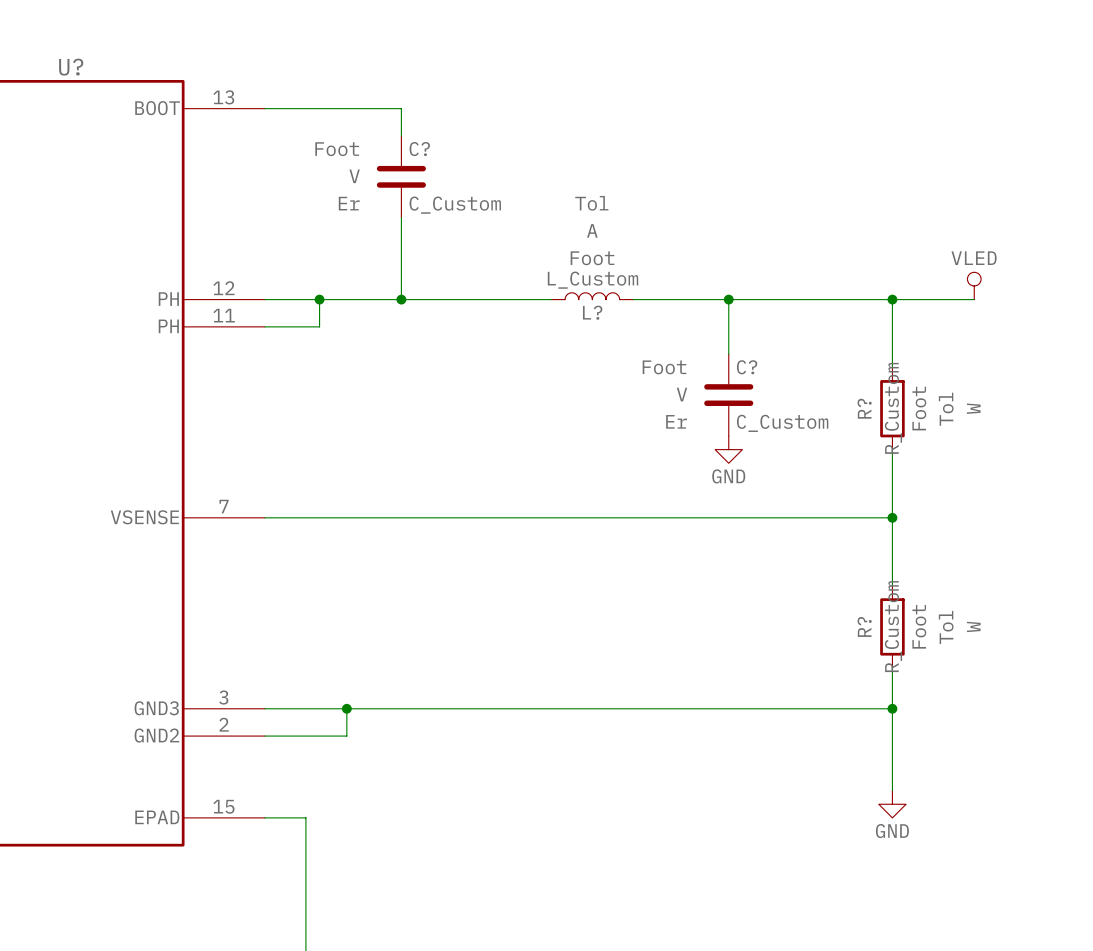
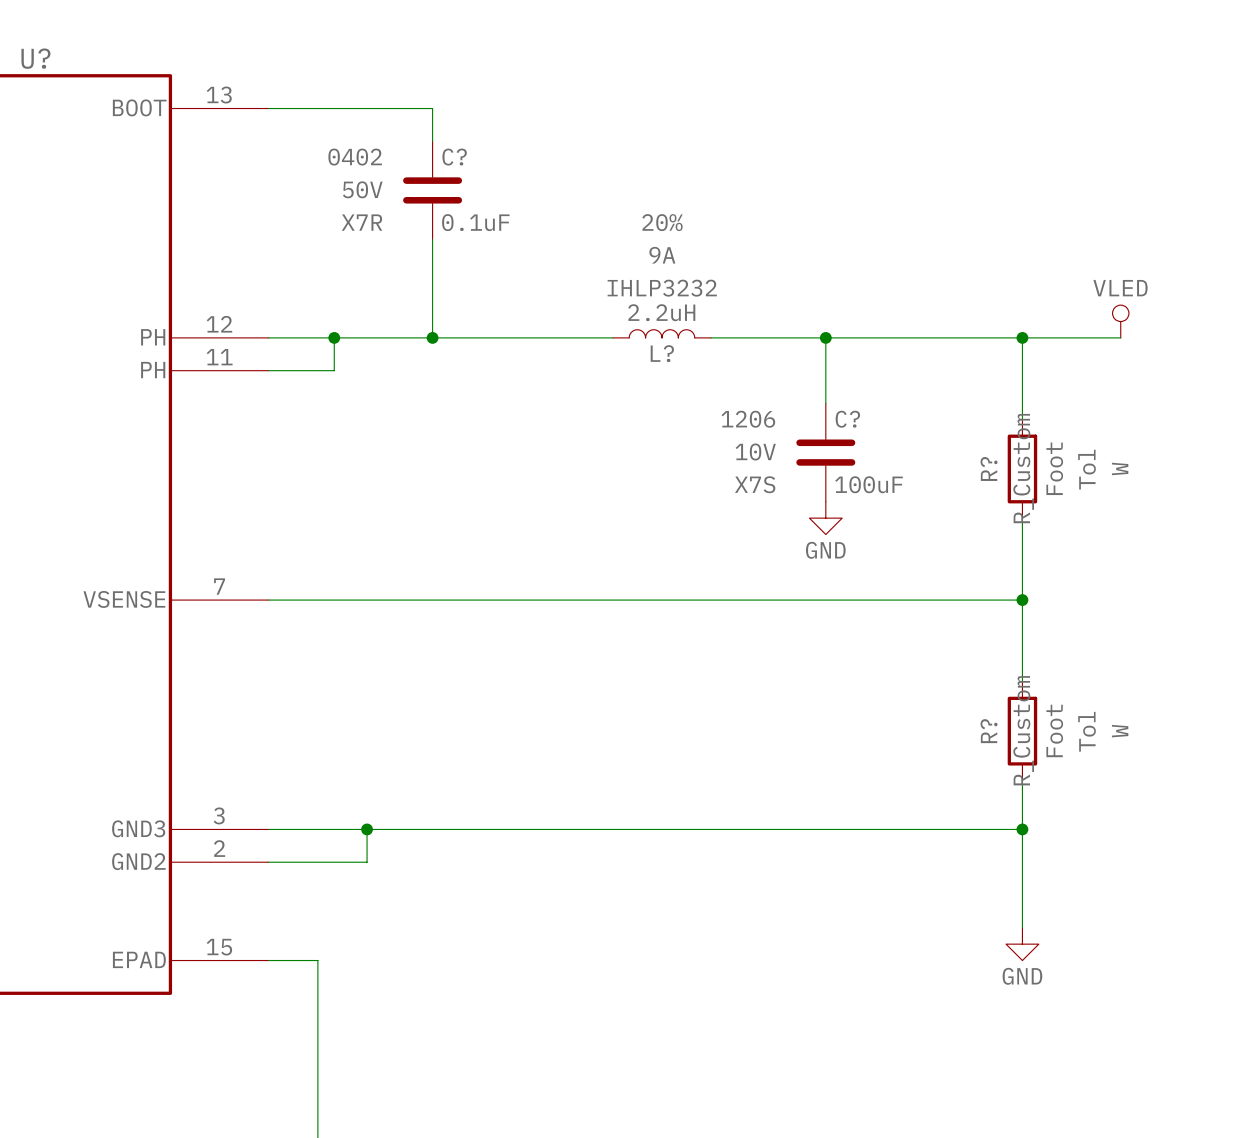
C? text: Foot (337, 149) -> 0402 (355, 157)
C? text: V (354, 176) -> 50V (362, 189)
C? text: Er (349, 203) -> X7R (362, 222)
L? text: Tol (591, 203) -> 20% (662, 222)
C? value: C_Custom (455, 205) -> 0.1uF (475, 222)
L? text: A (592, 230) -> 9A (662, 255)
L? text: Foot (592, 258) -> IHLP3232 (662, 288)
L? value: L_Custom (593, 280) -> 2.2uH (661, 312)
C? text: Foot (664, 367) -> 1206 (748, 419)
C? text: V (681, 394) -> 10V (755, 451)
C? text: Er (676, 421) -> X7S (755, 484)
C? value: C_Custom (782, 423) -> 100uF (869, 484)

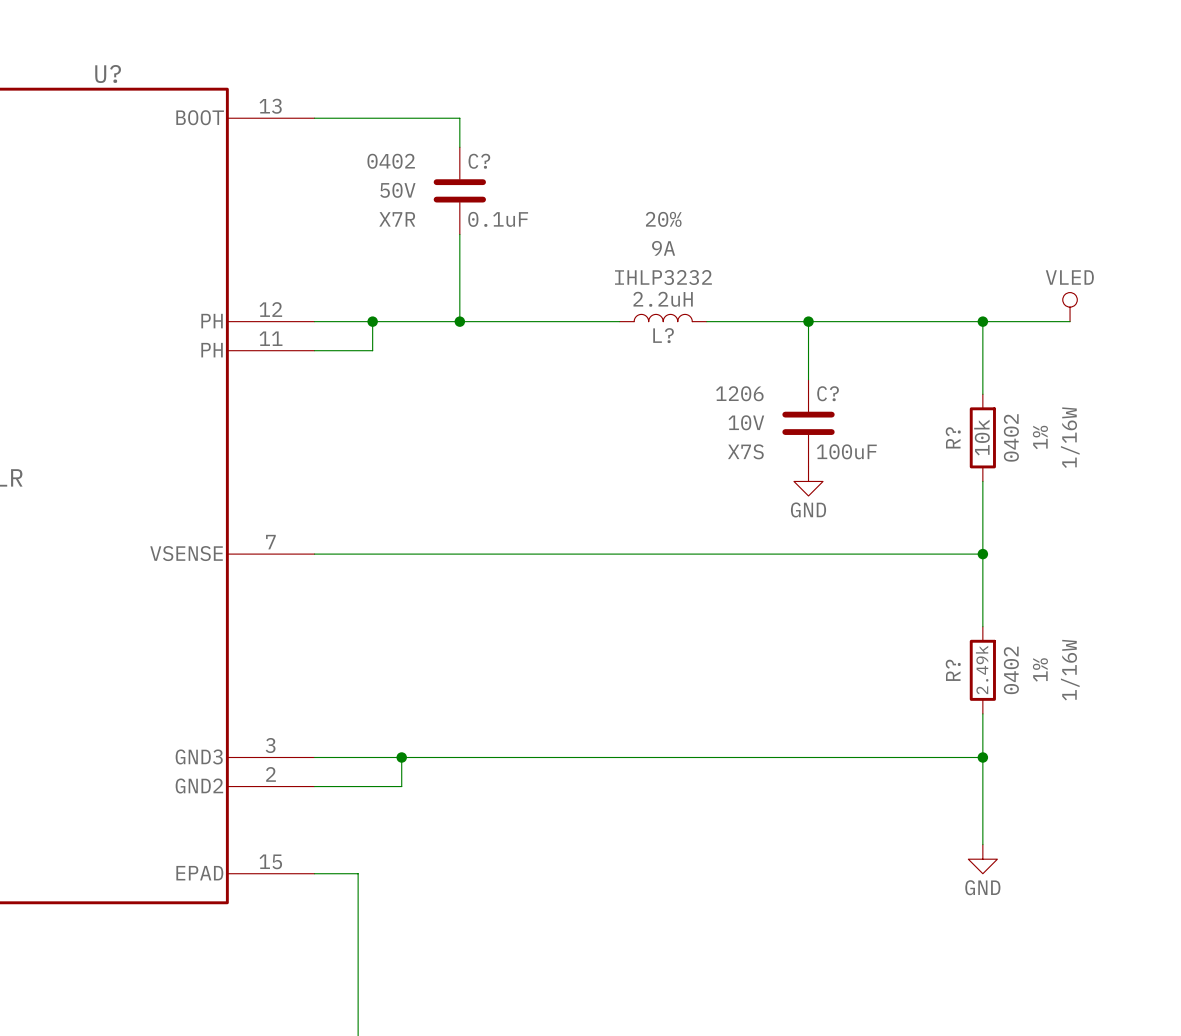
R? value: R_Custom (1023, 468) -> 10k (982, 437)
R? text: Foot (1054, 468) -> 0402 (1011, 437)
R? text: W (1120, 468) -> 1/16W (1070, 437)
R? text: Tol (1087, 469) -> 1% (1040, 437)
R? value: R_Custom (1023, 730) -> 2.49k (982, 670)
R? text: Foot (1054, 730) -> 0402 (1011, 670)
R? text: Tol (1087, 731) -> 1% (1040, 669)
R? text: W (1120, 731) -> 1/16W (1070, 670)

